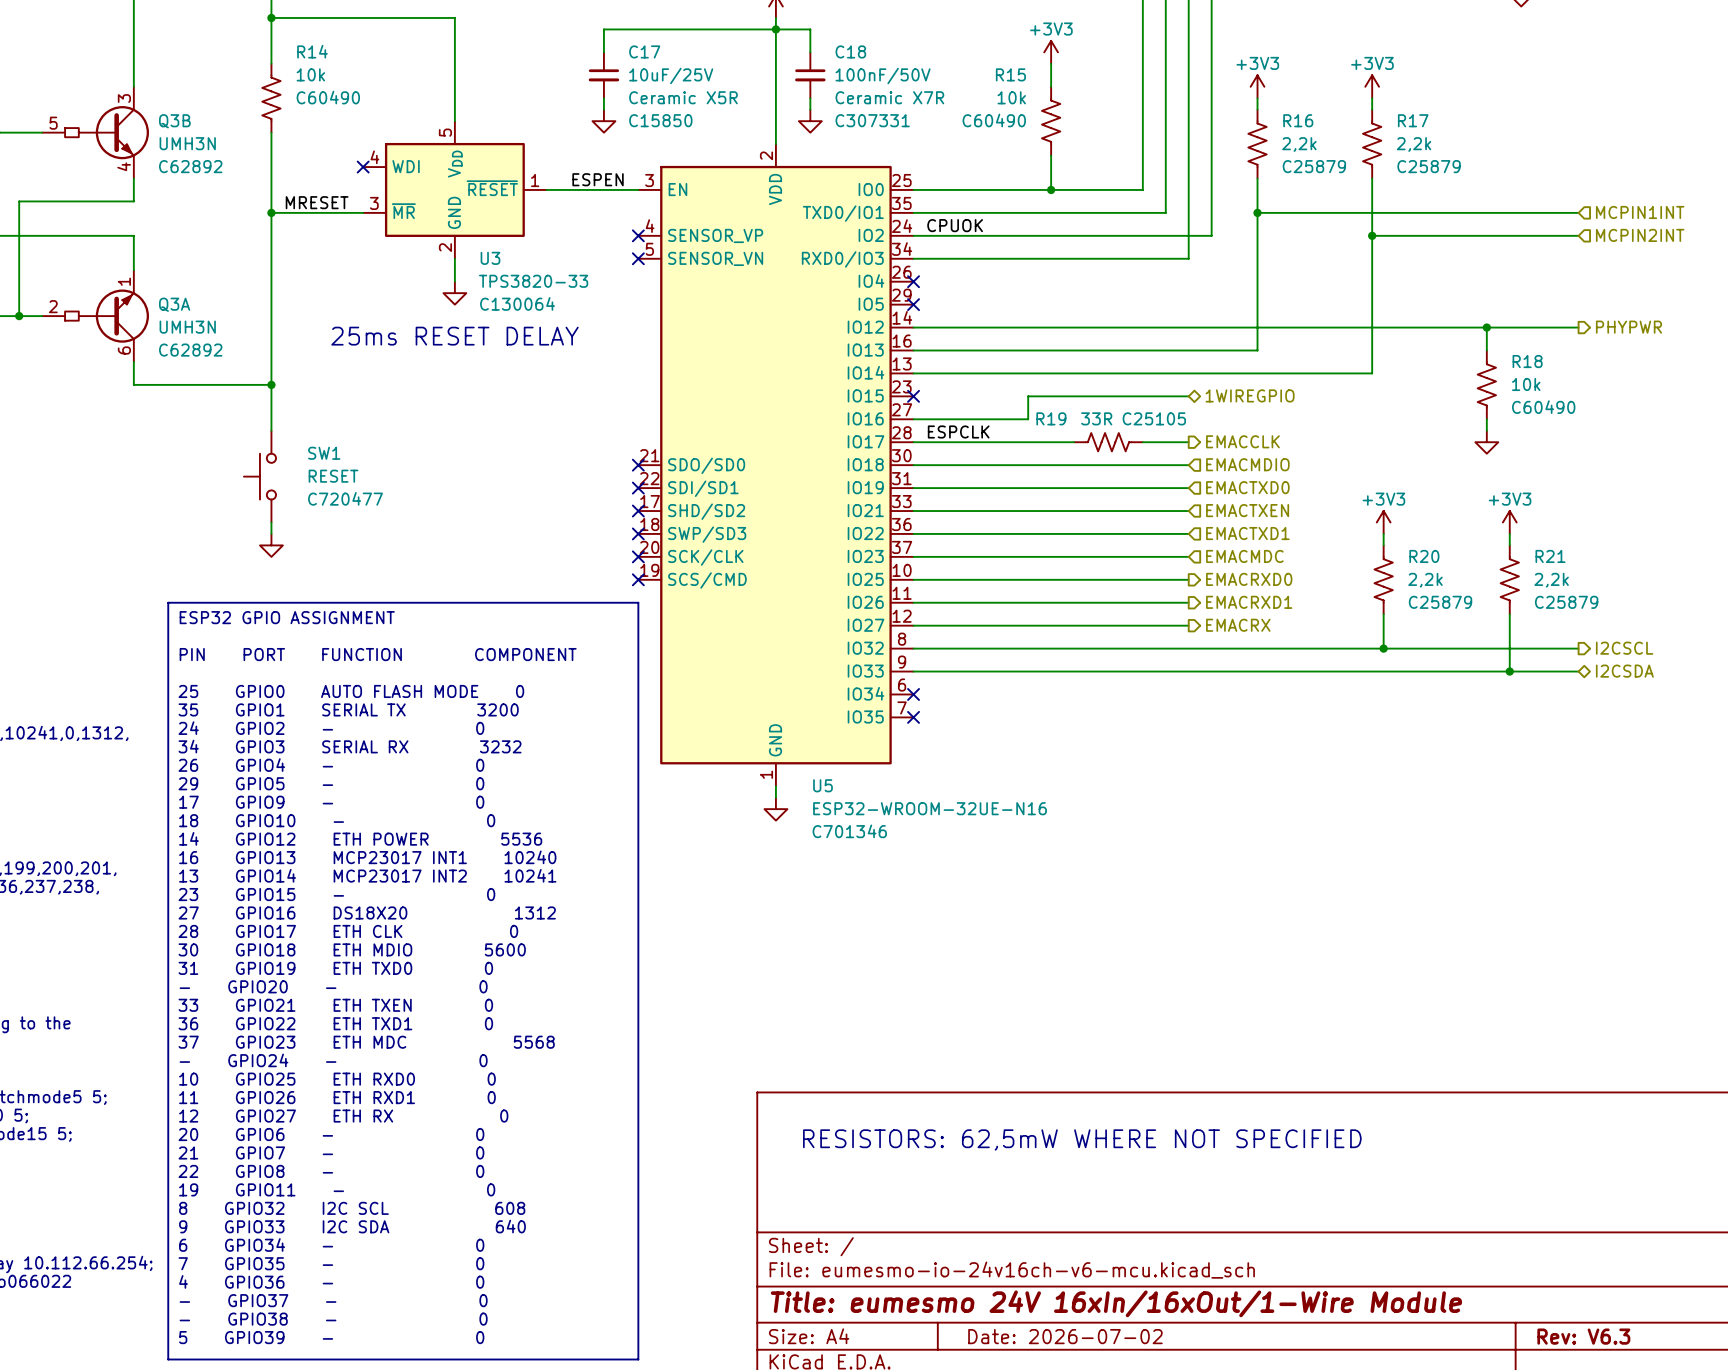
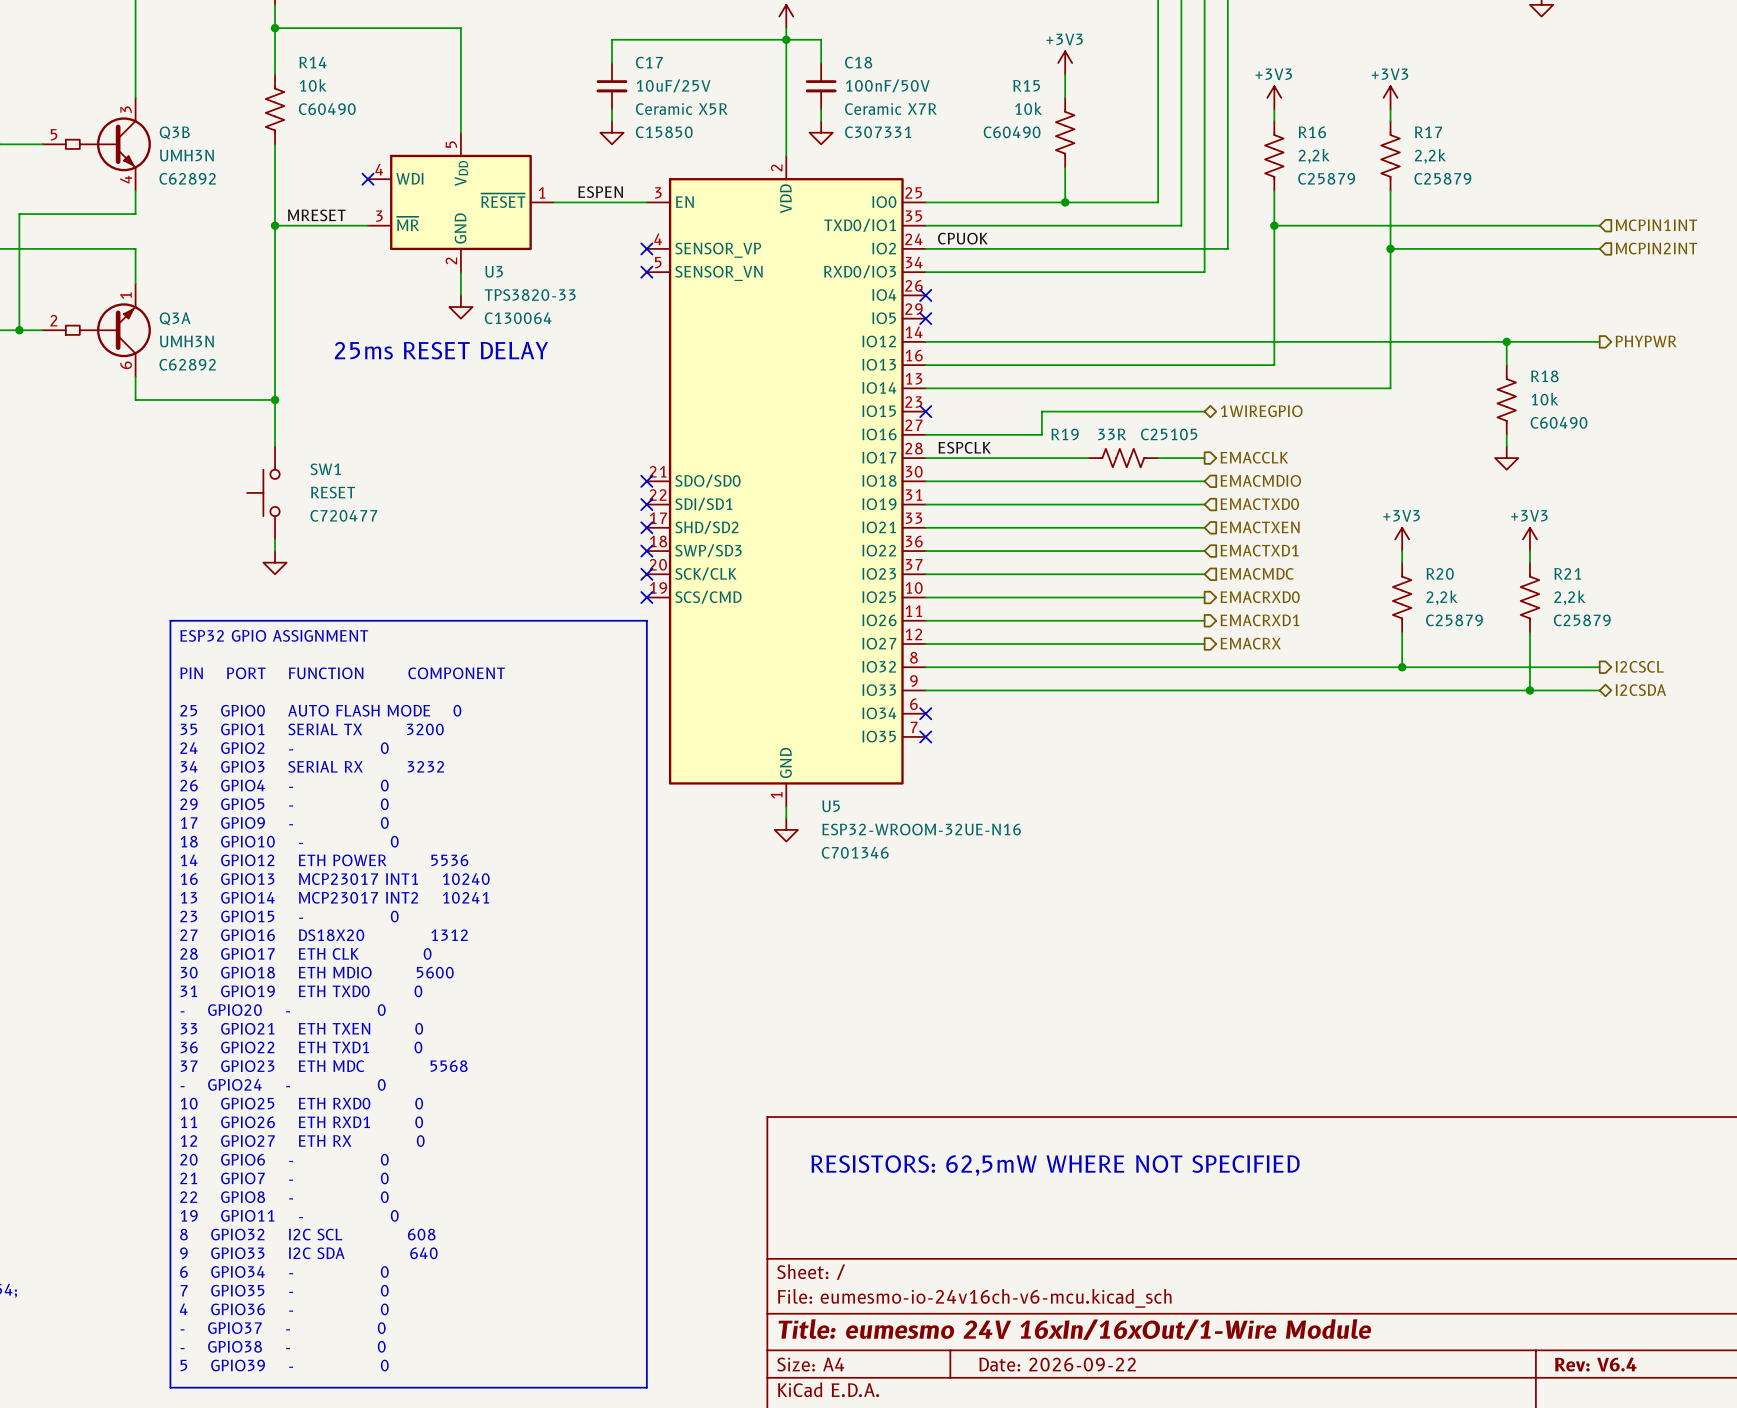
title block: Date: 2026-07-02 (1065, 1336) -> Date: 2026-09-22 (1057, 1364)
title block: Rev: V6.3 (1583, 1336) -> Rev: V6.4 (1595, 1364)

